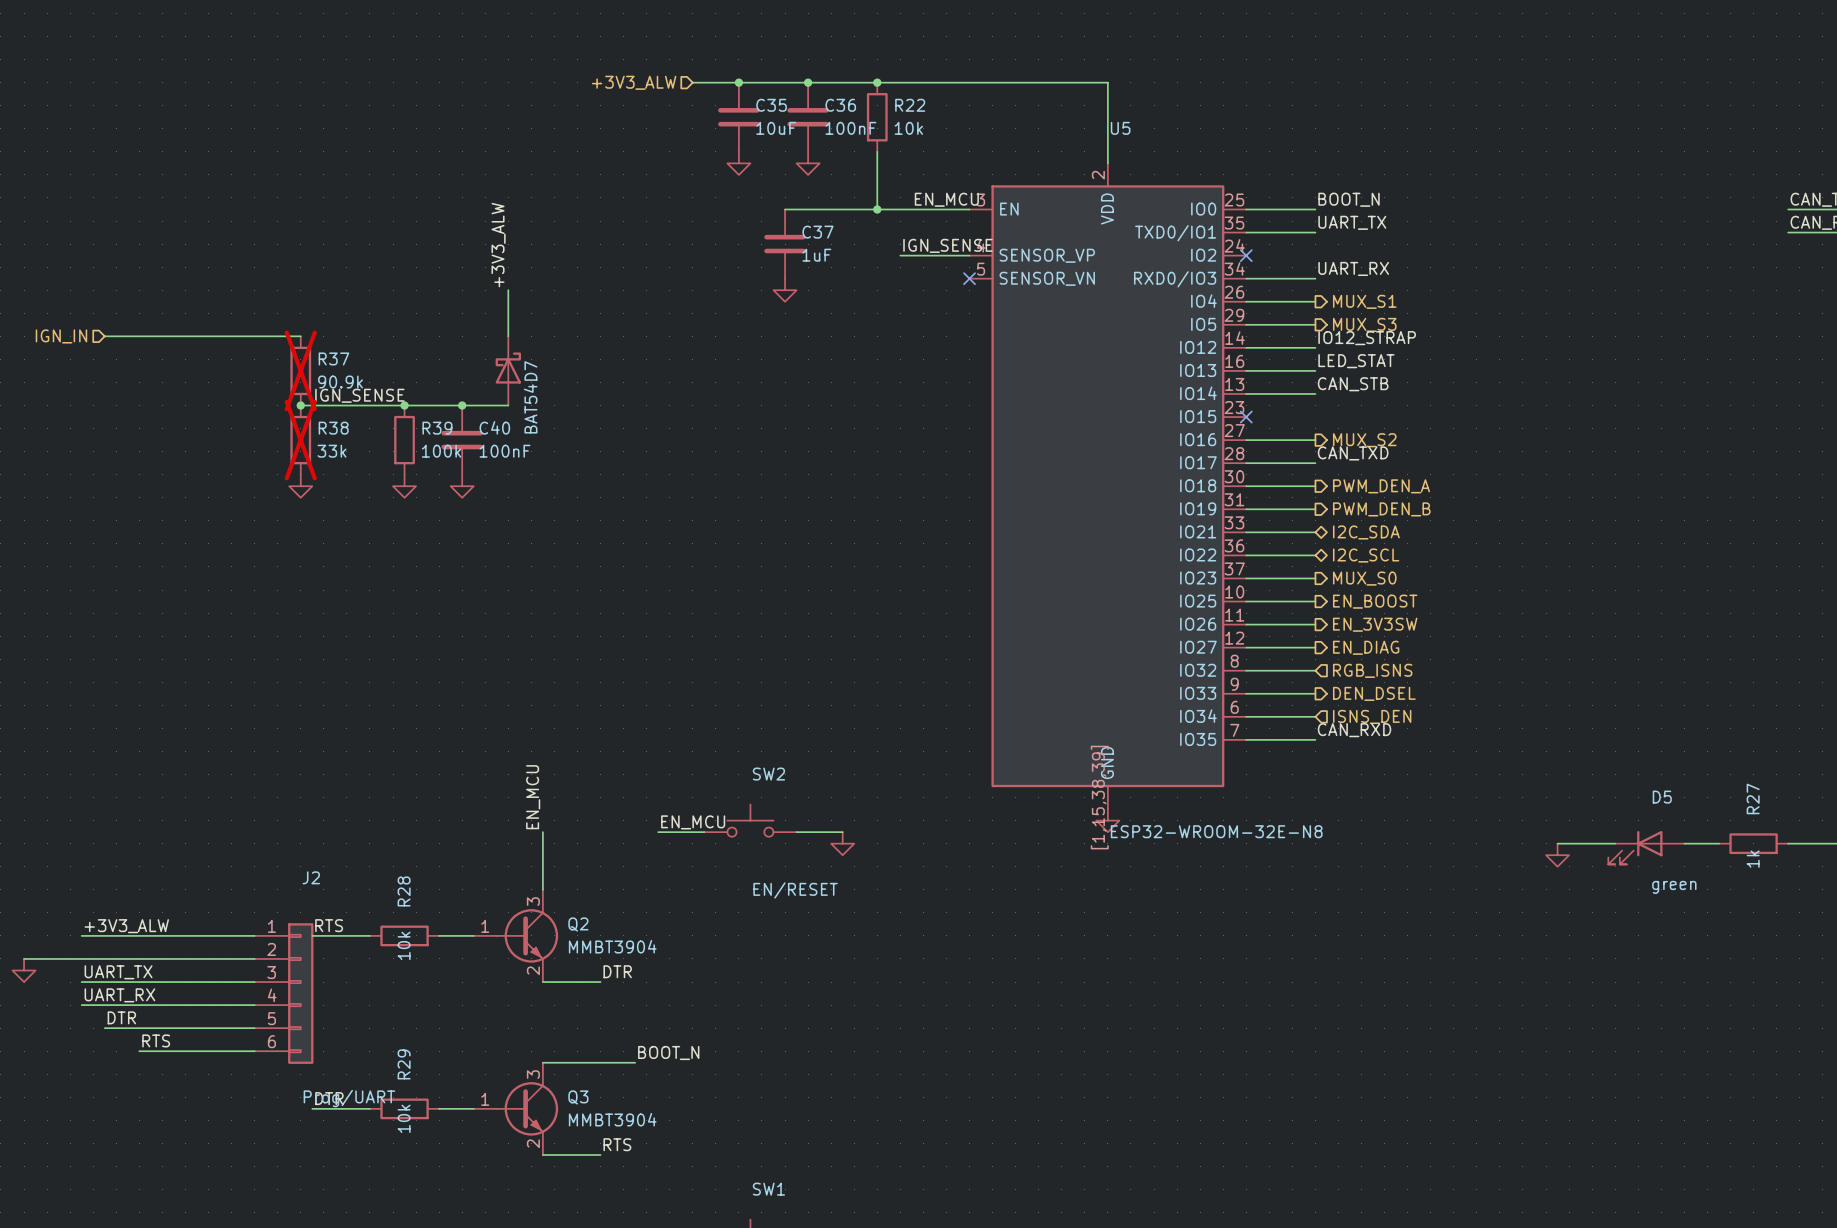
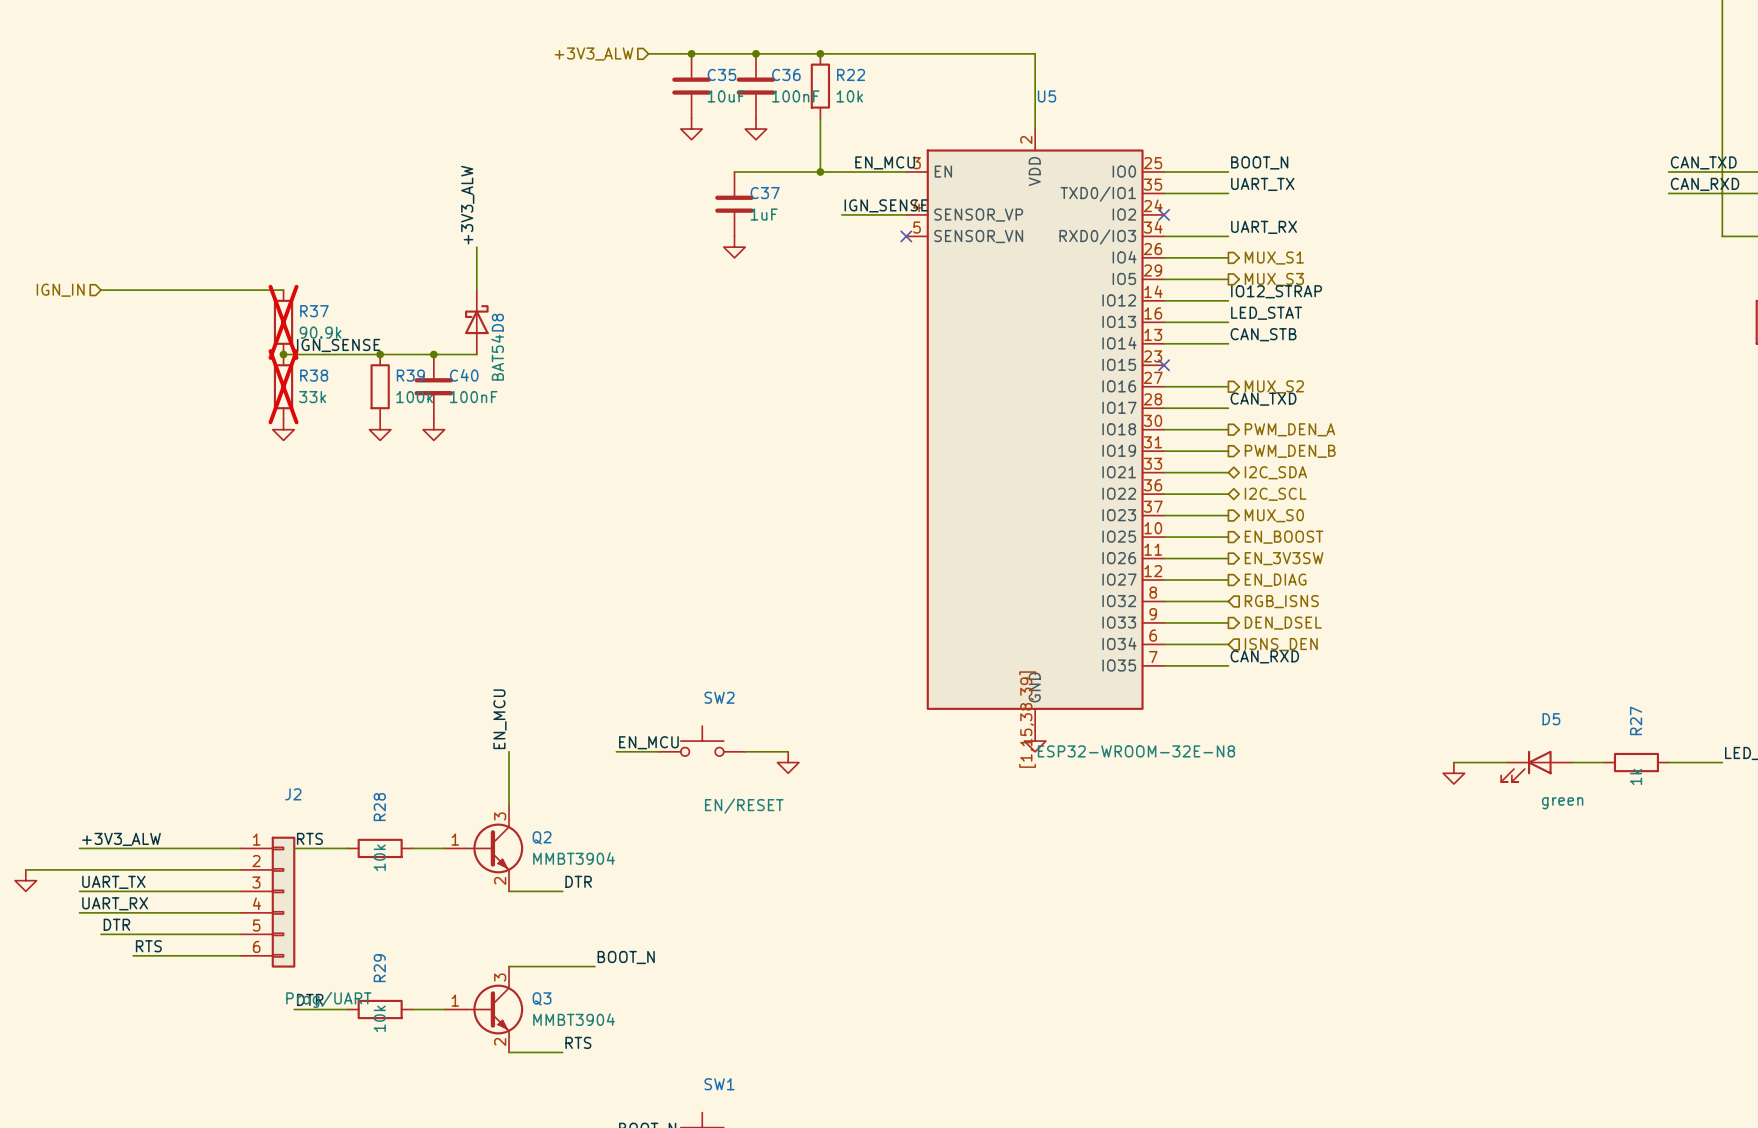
D7 name: D7 (530, 371) -> D8 (497, 322)

